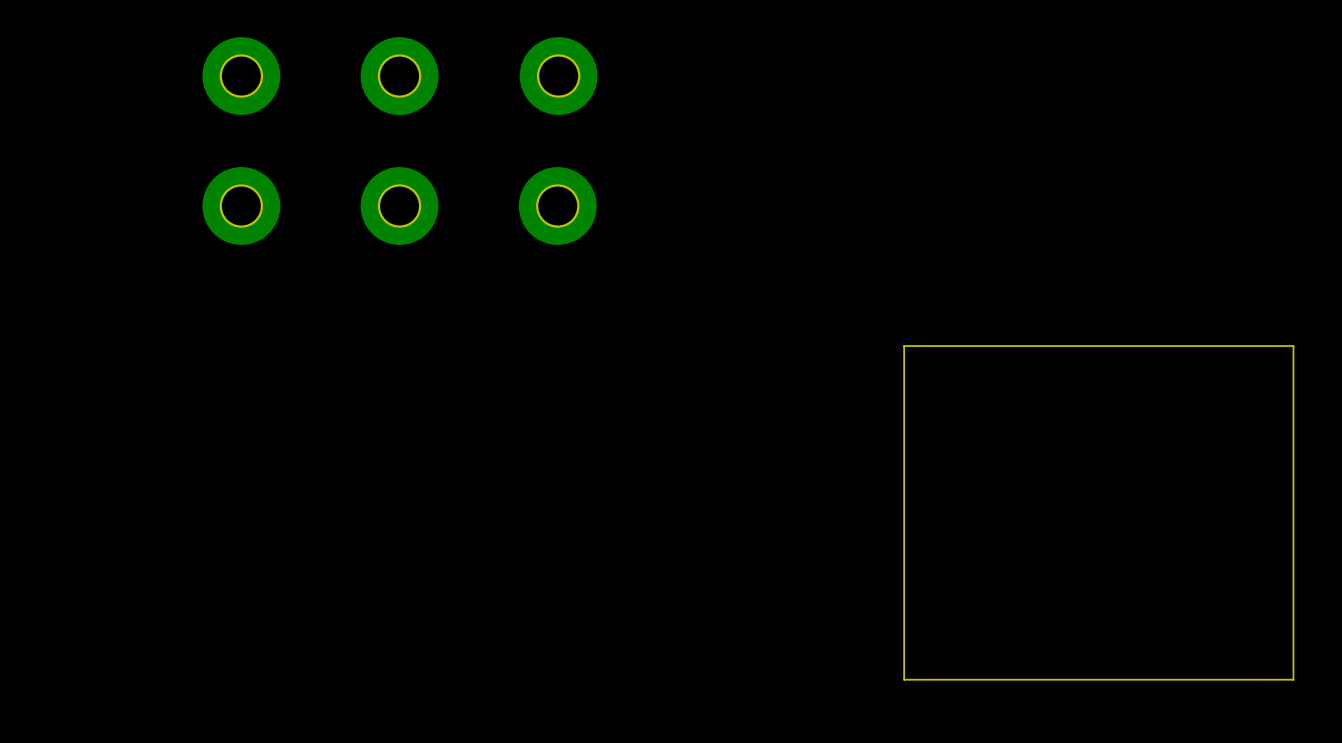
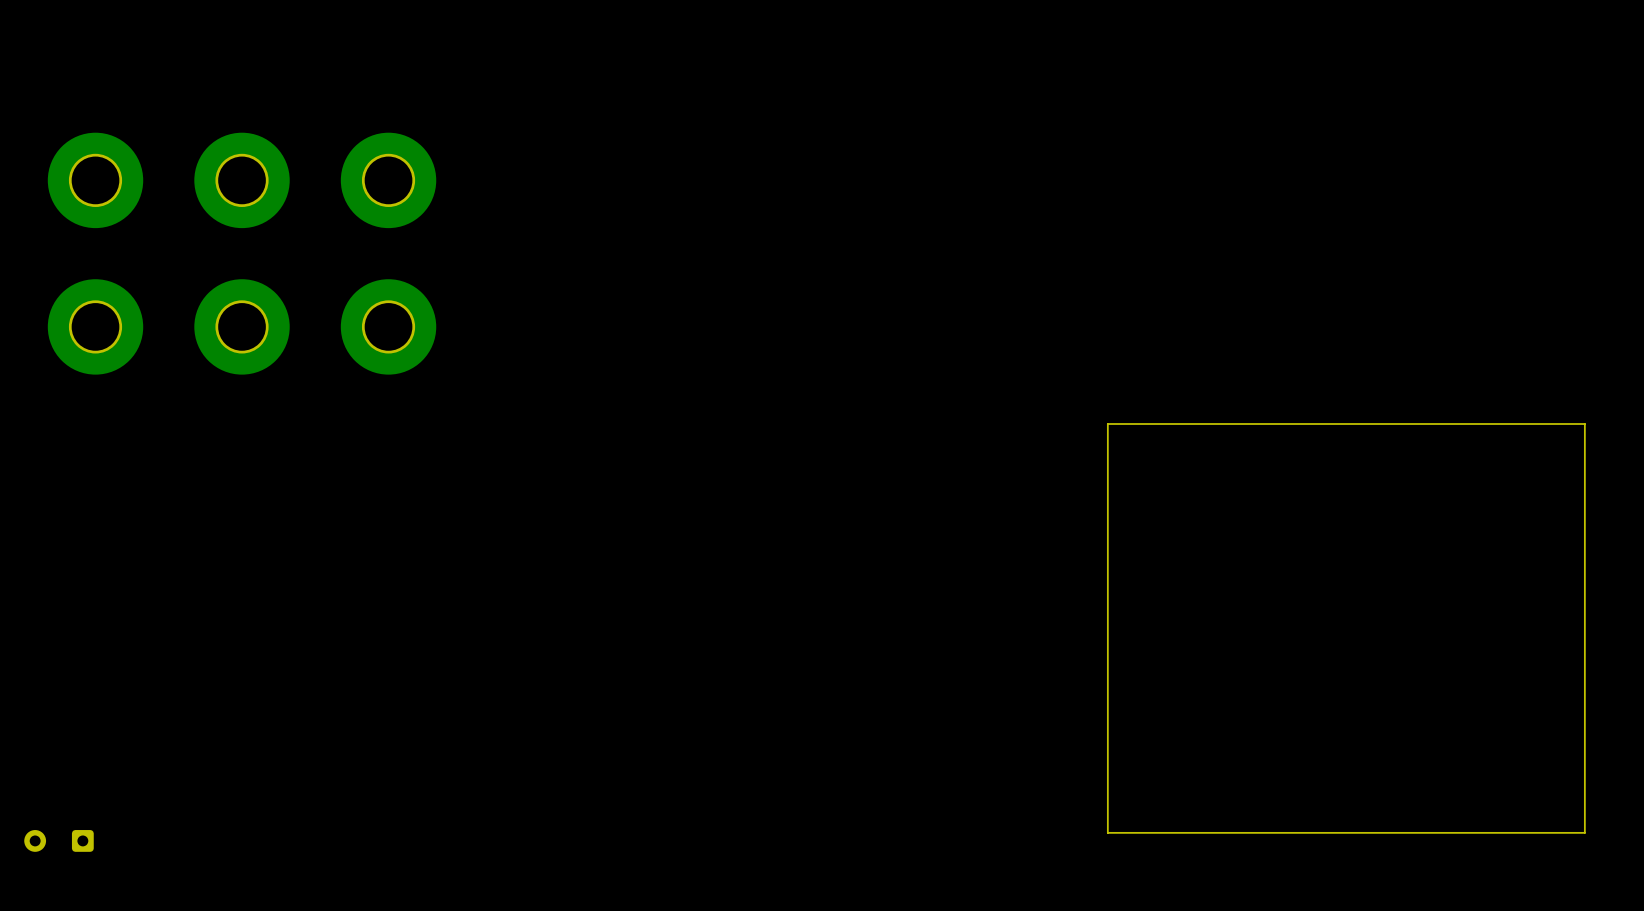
part: (241, 76) -> none
part: (399, 76) -> none
part: (558, 76) -> none
part: none -> (95, 180)
part: none -> (242, 180)
part: none -> (388, 180)
part: (241, 206) -> none
part: (399, 206) -> none
part: (557, 206) -> none
part: none -> (95, 326)
part: none -> (242, 326)
part: none -> (388, 326)
part: none -> (59, 840)

